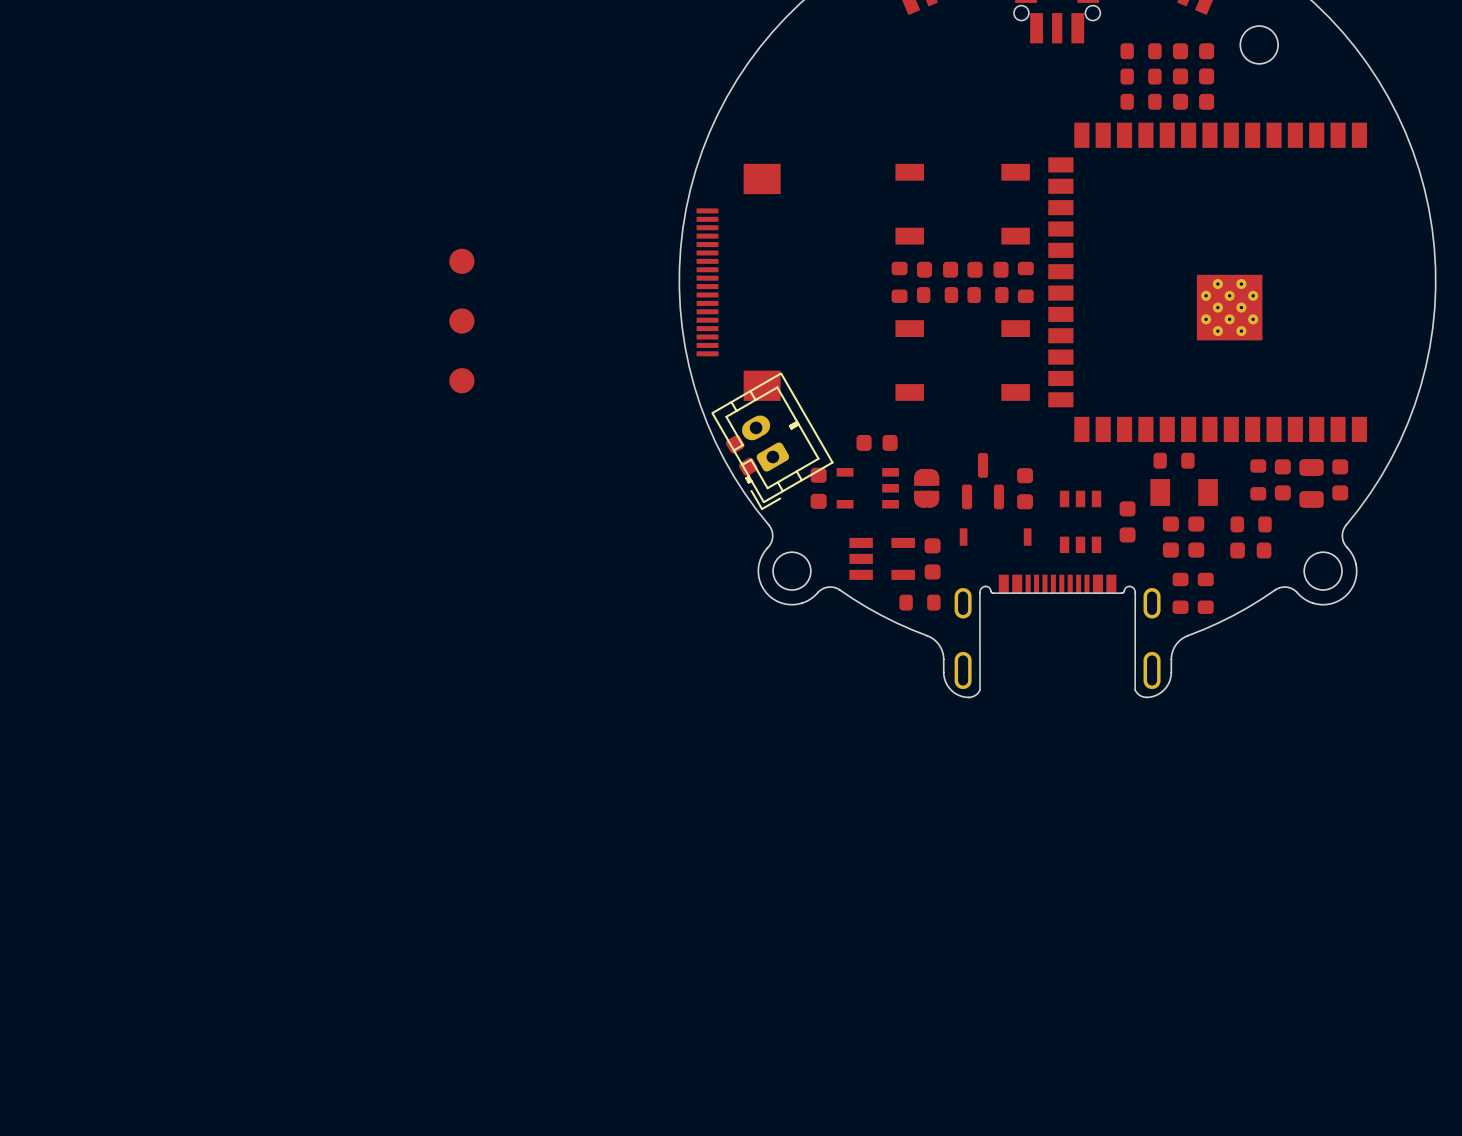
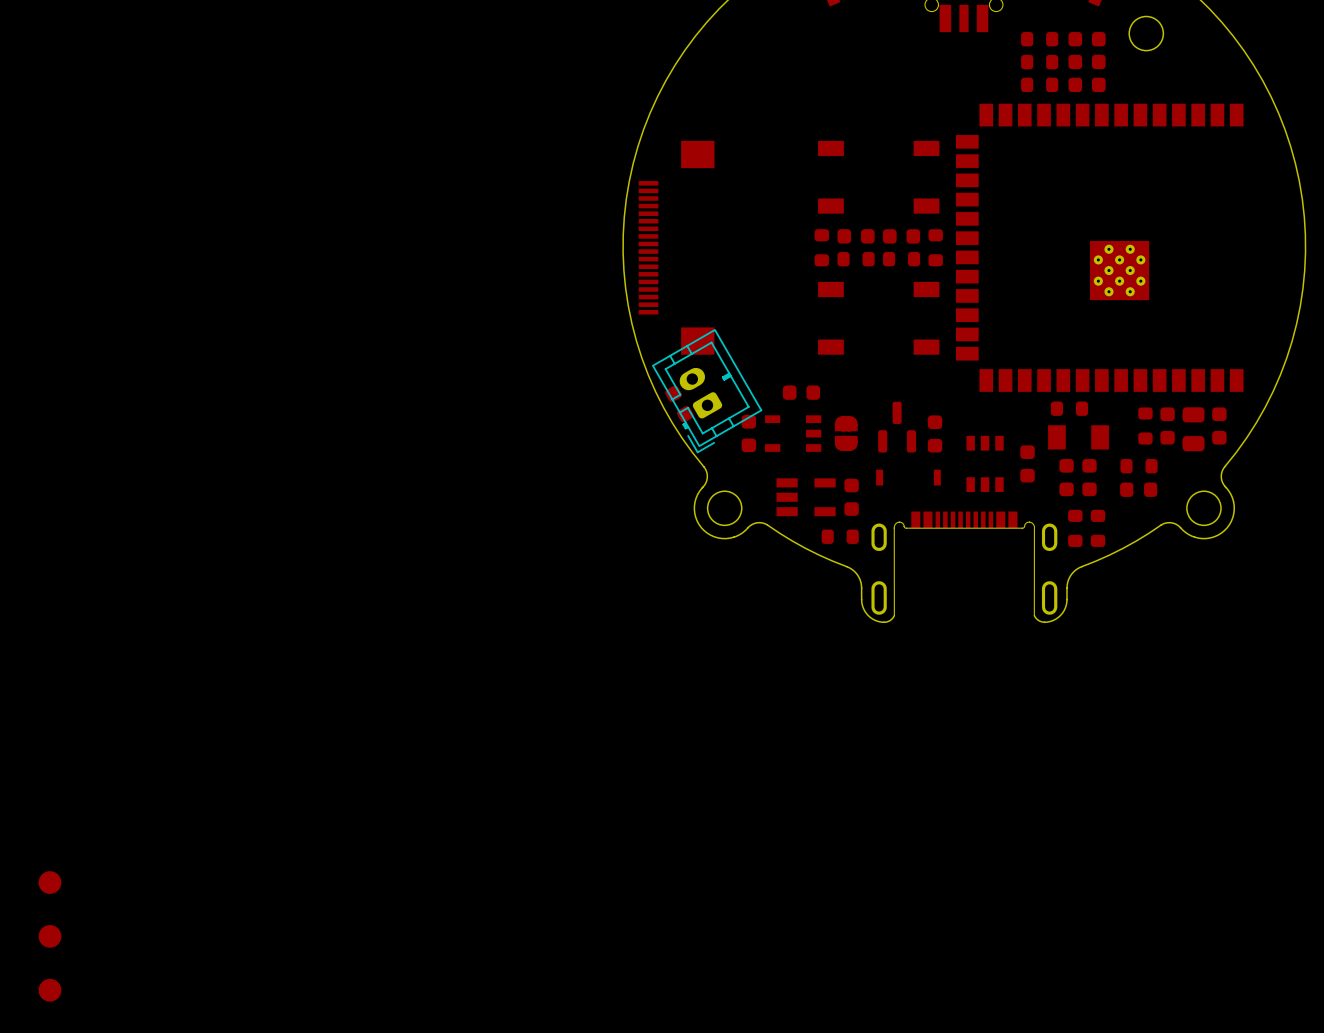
part: (461, 261) -> none
part: (461, 321) -> none
part: (461, 380) -> none
part: none -> (49, 882)
part: none -> (49, 936)
part: none -> (49, 990)

